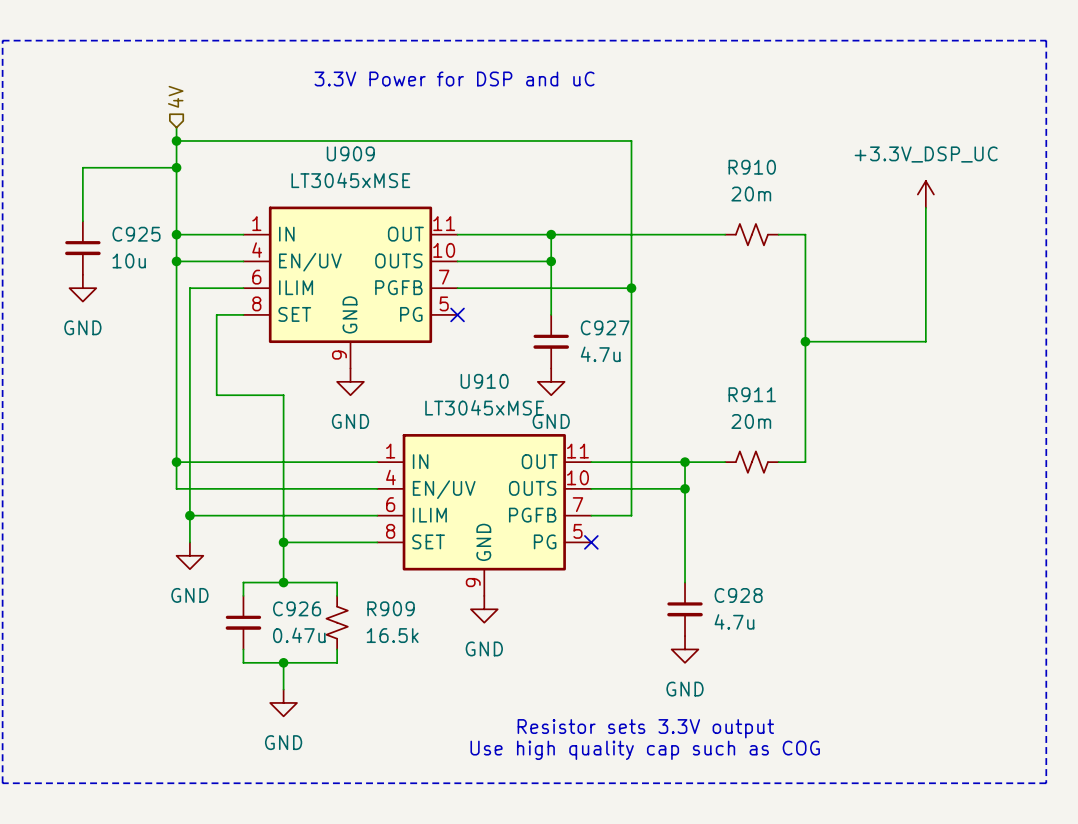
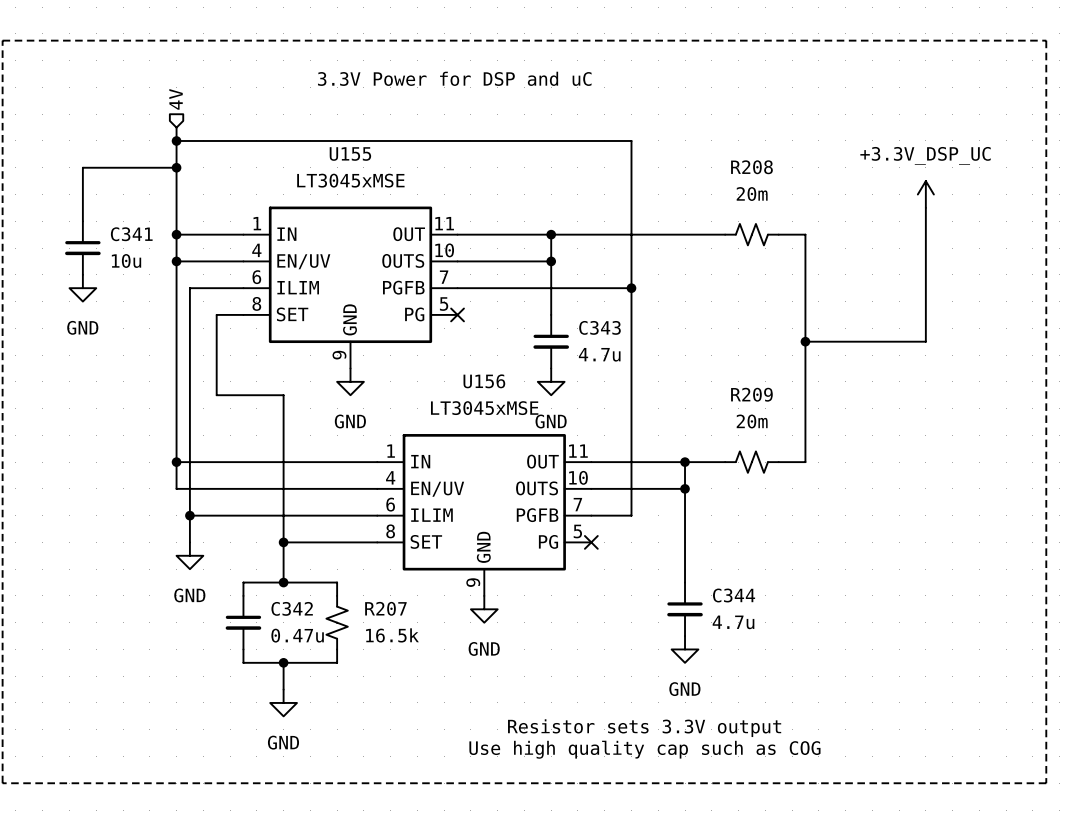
U909 name: U909 (350, 153) -> U155 (350, 154)
R910 name: R910 (752, 167) -> R208 (751, 167)
C925 name: C925 (136, 234) -> C341 (131, 234)
C927 name: C927 (605, 327) -> C343 (600, 327)
U910 name: U910 (484, 381) -> U156 (484, 381)
R911 name: R911 (752, 394) -> R209 (751, 394)
C928 name: C928 (738, 595) -> C344 (734, 595)
C926 name: C926 (297, 608) -> C342 (292, 608)
R909 name: R909 (391, 608) -> R207 (385, 608)

